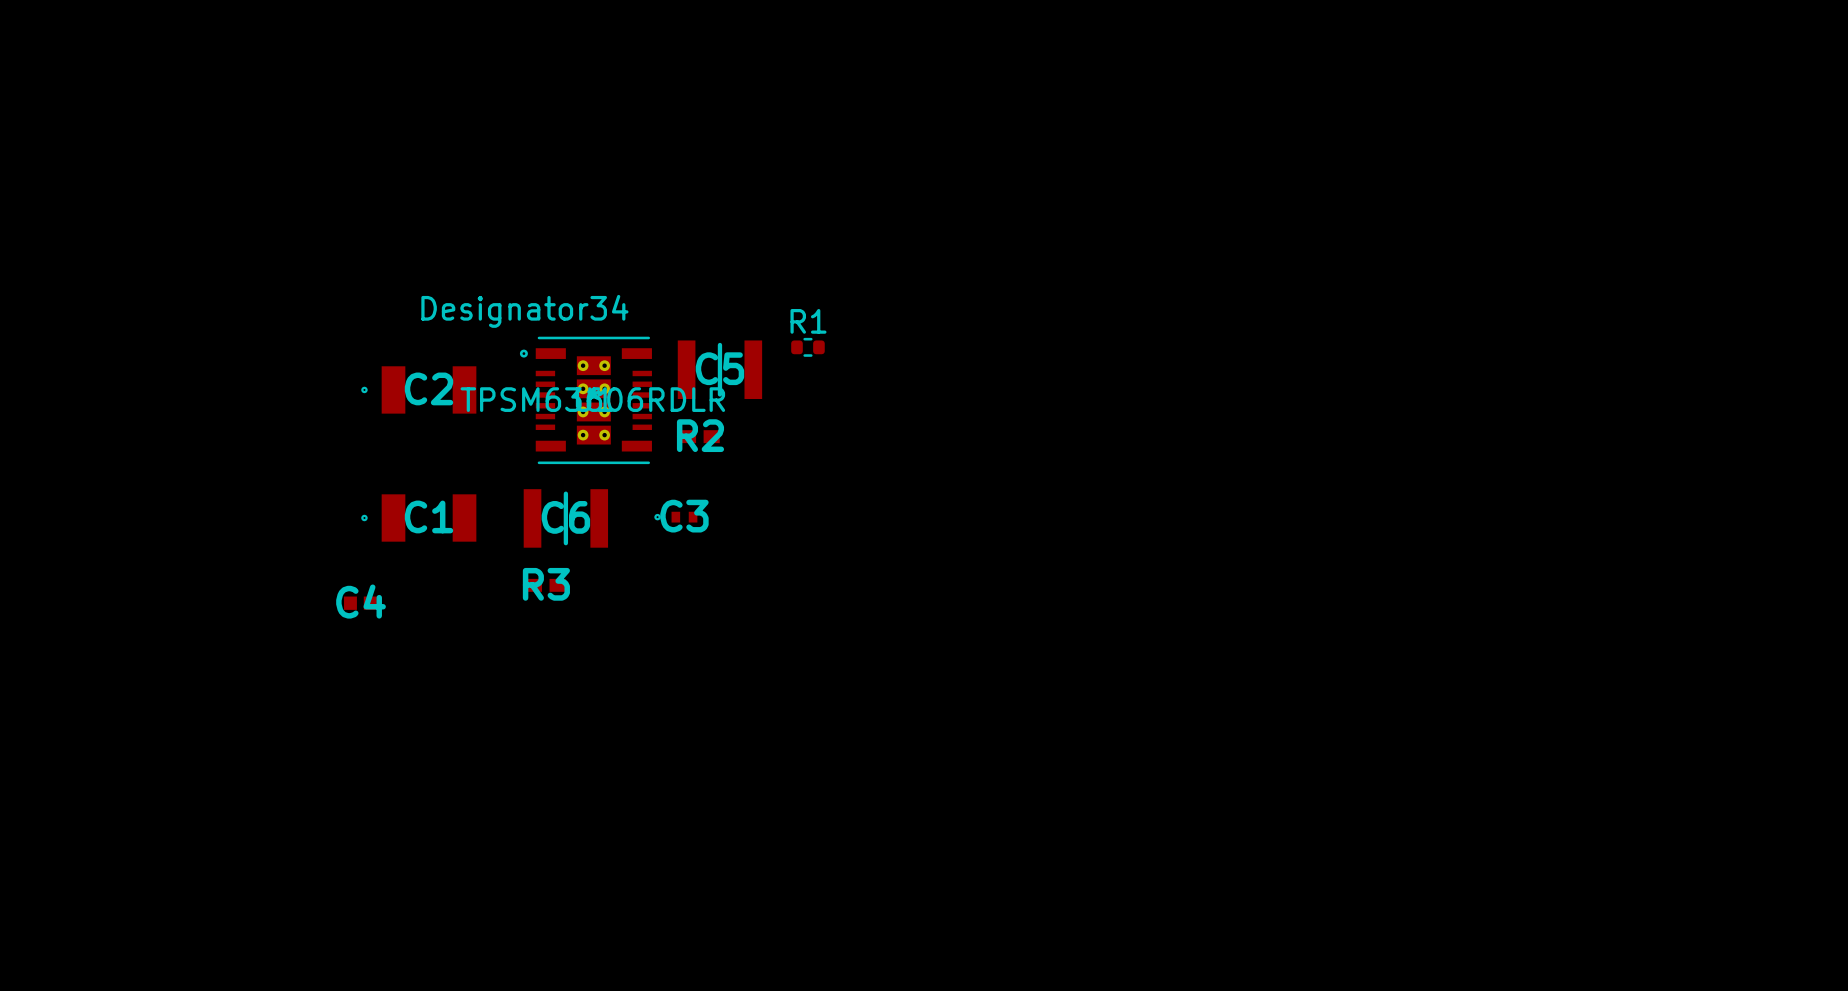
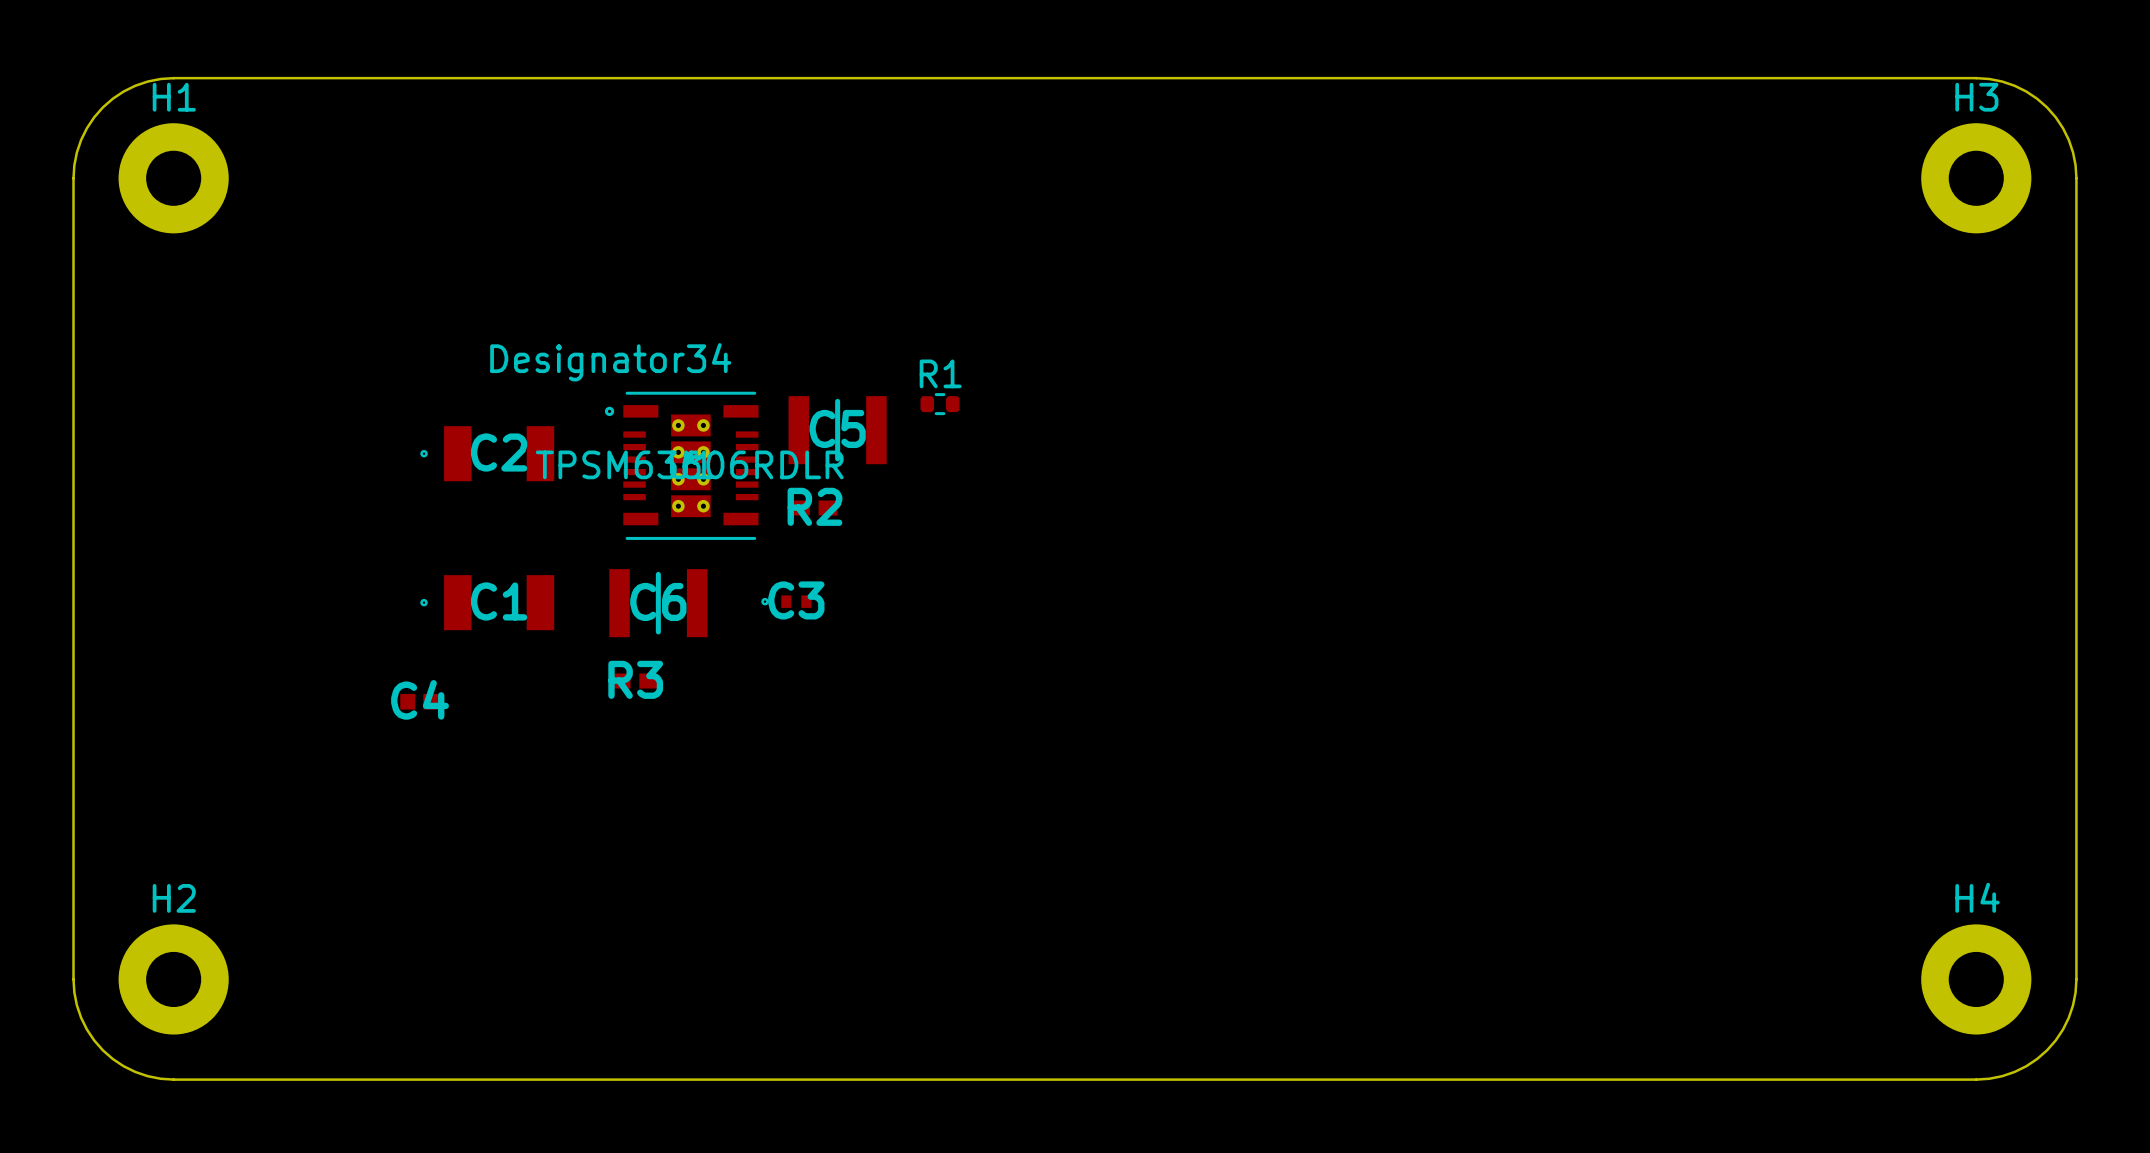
board edge: none -> (173, 78) (1976, 78) (2002, 81) (2026, 91) (2047, 107) (2063, 128) (2073, 152) (2076, 178) (2076, 979) (2073, 1005) (2063, 1029) (2047, 1050) (2026, 1066) (2002, 1076) (1976, 1079) (173, 1079) (147, 1076) (123, 1066) (102, 1050) (86, 1029) (76, 1005) (73, 979) (73, 178) (74, 165) (81, 139) (86, 128) (102, 107) (123, 91) (135, 85) (160, 79) (173, 78)
H1: none -> (173, 178)
H3: none -> (1976, 178)
H2: none -> (173, 979)
H4: none -> (1976, 979)

